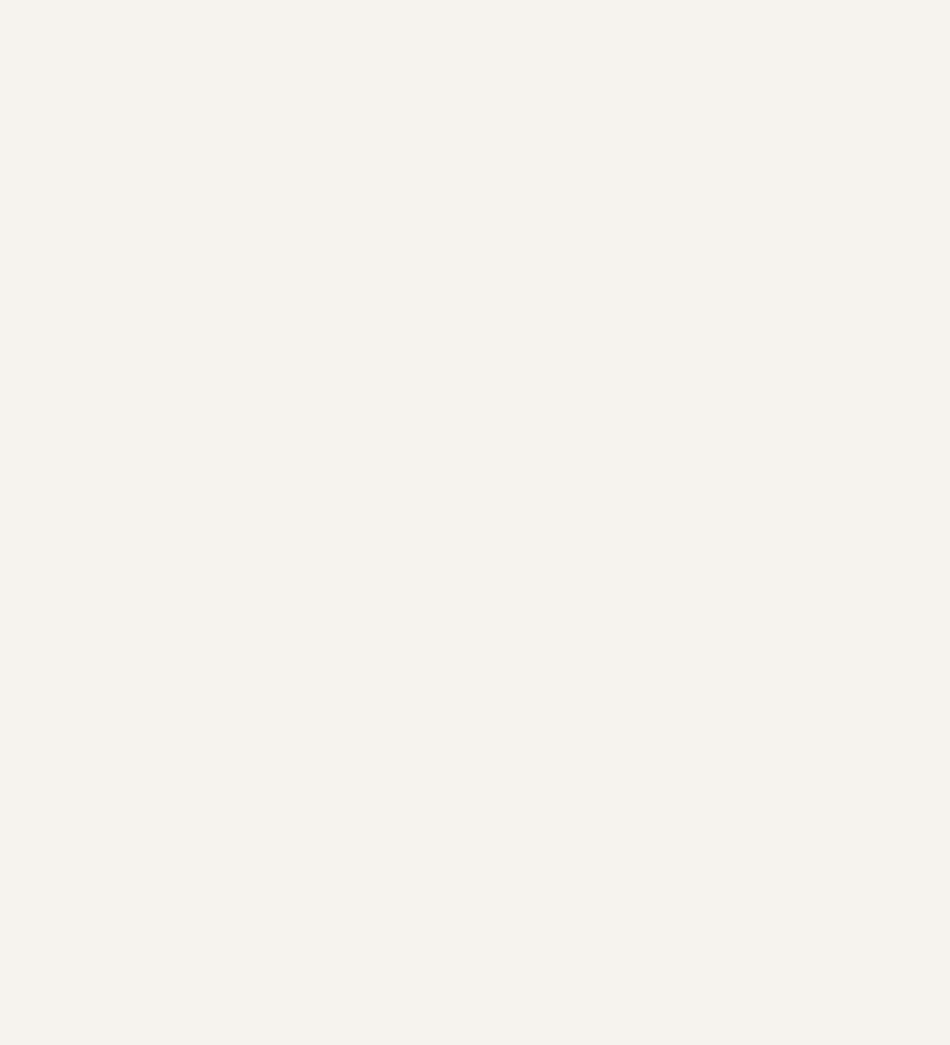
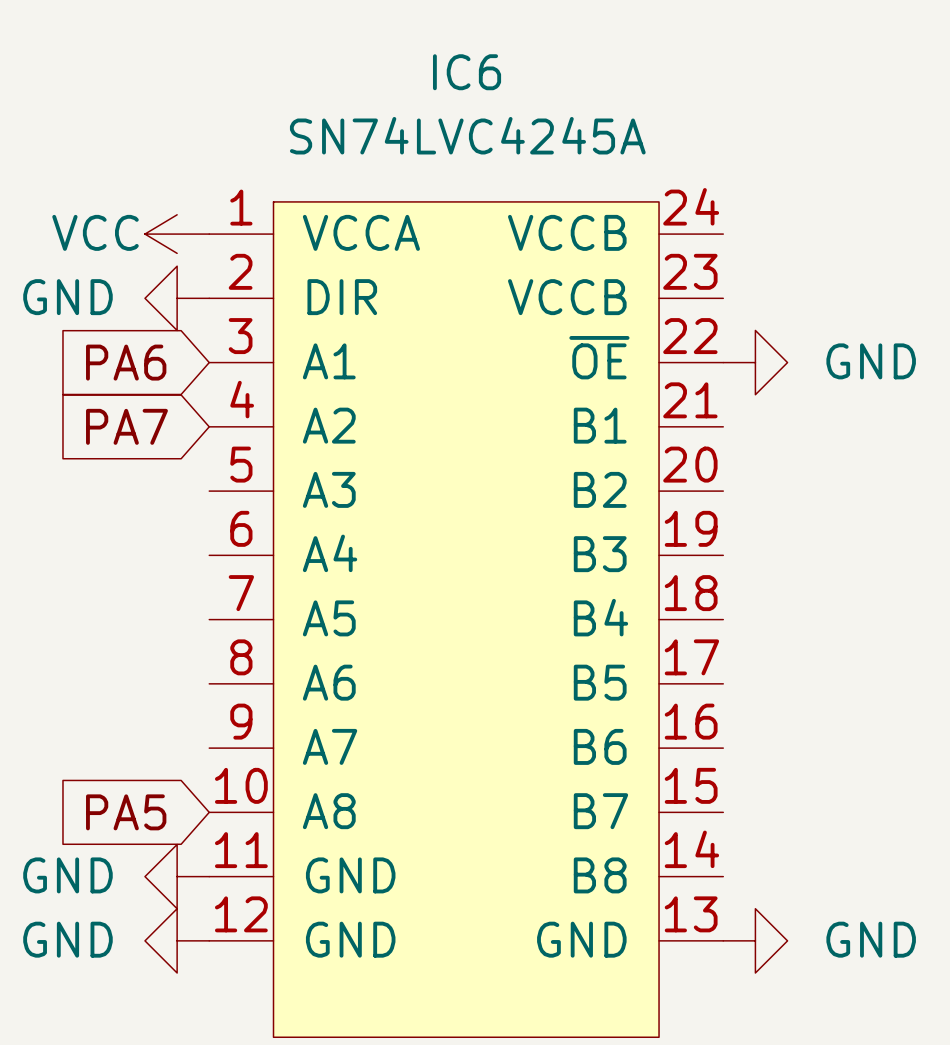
power symbol: none -> VCC (177, 234)
power symbol: none -> GND (177, 298)
global label: none -> PA6 (126, 362)
power symbol: none -> GND (755, 362)
global label: none -> PA7 (126, 426)
IC6: none -> SN74LVC4245A (466, 619)
global label: none -> PA5 (126, 812)
power symbol: none -> GND (177, 876)
power symbol: none -> GND (177, 940)
power symbol: none -> GND (755, 940)

